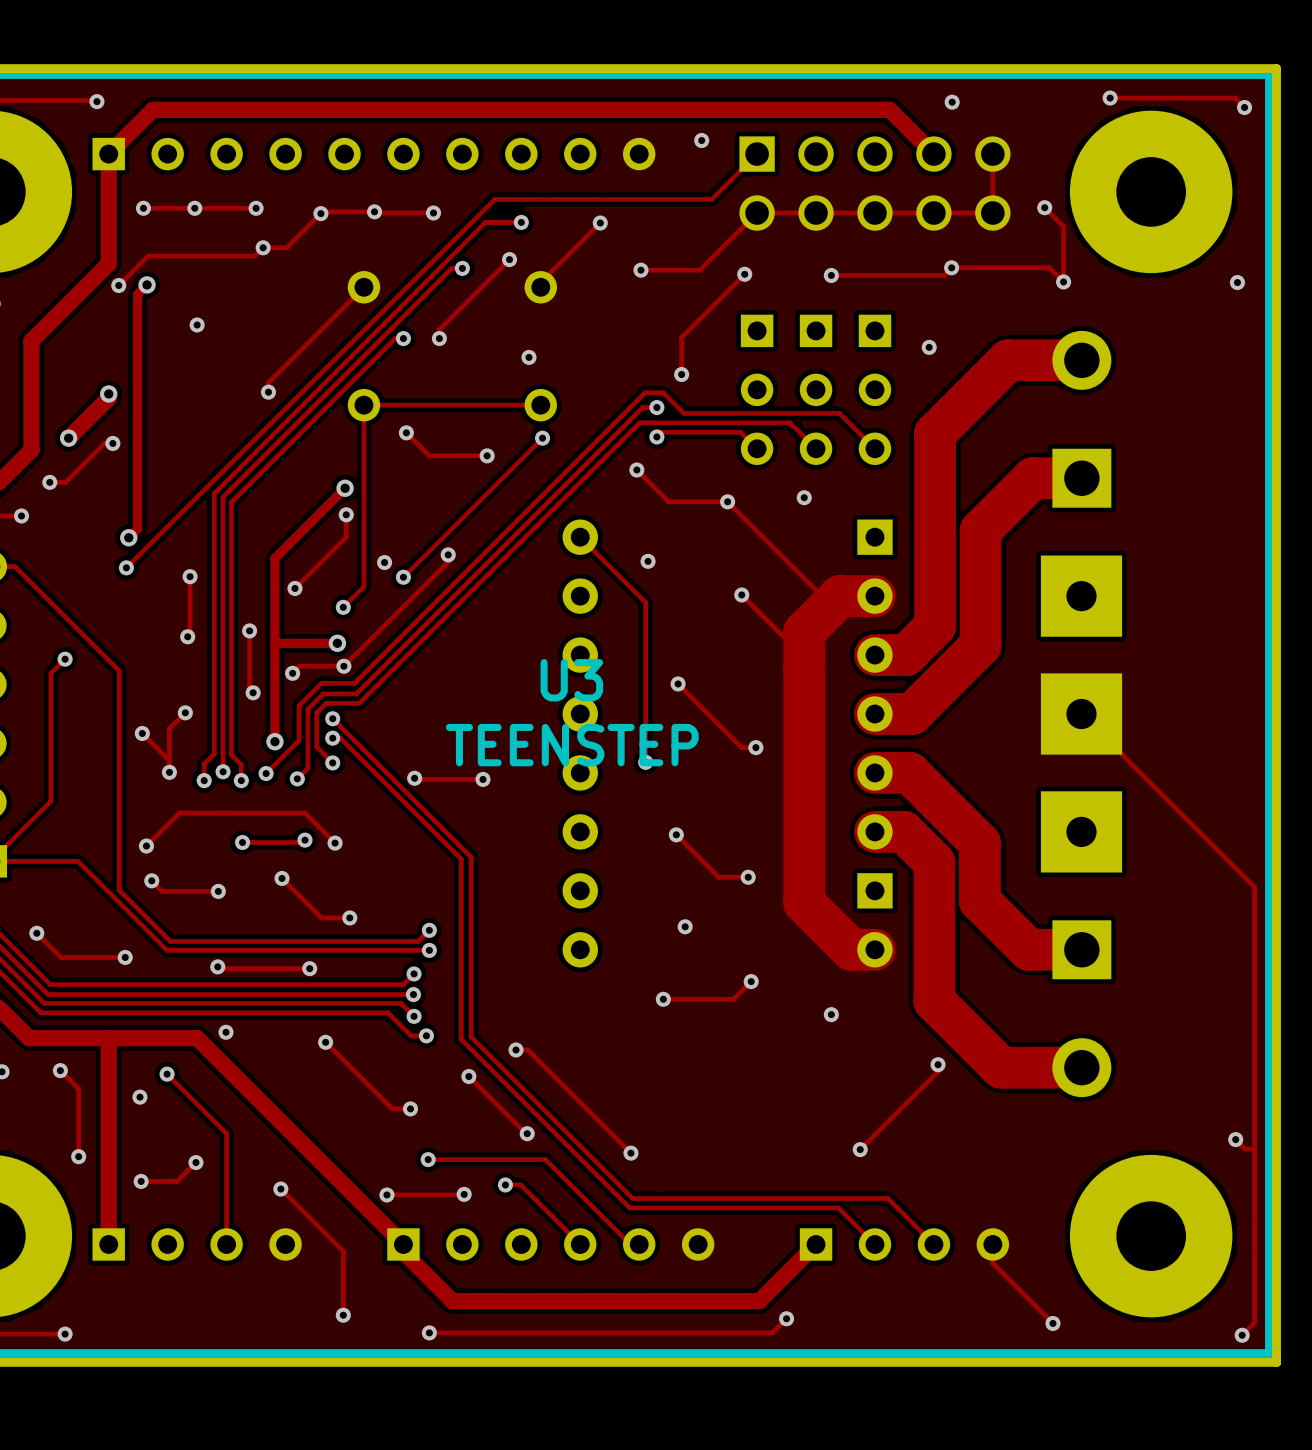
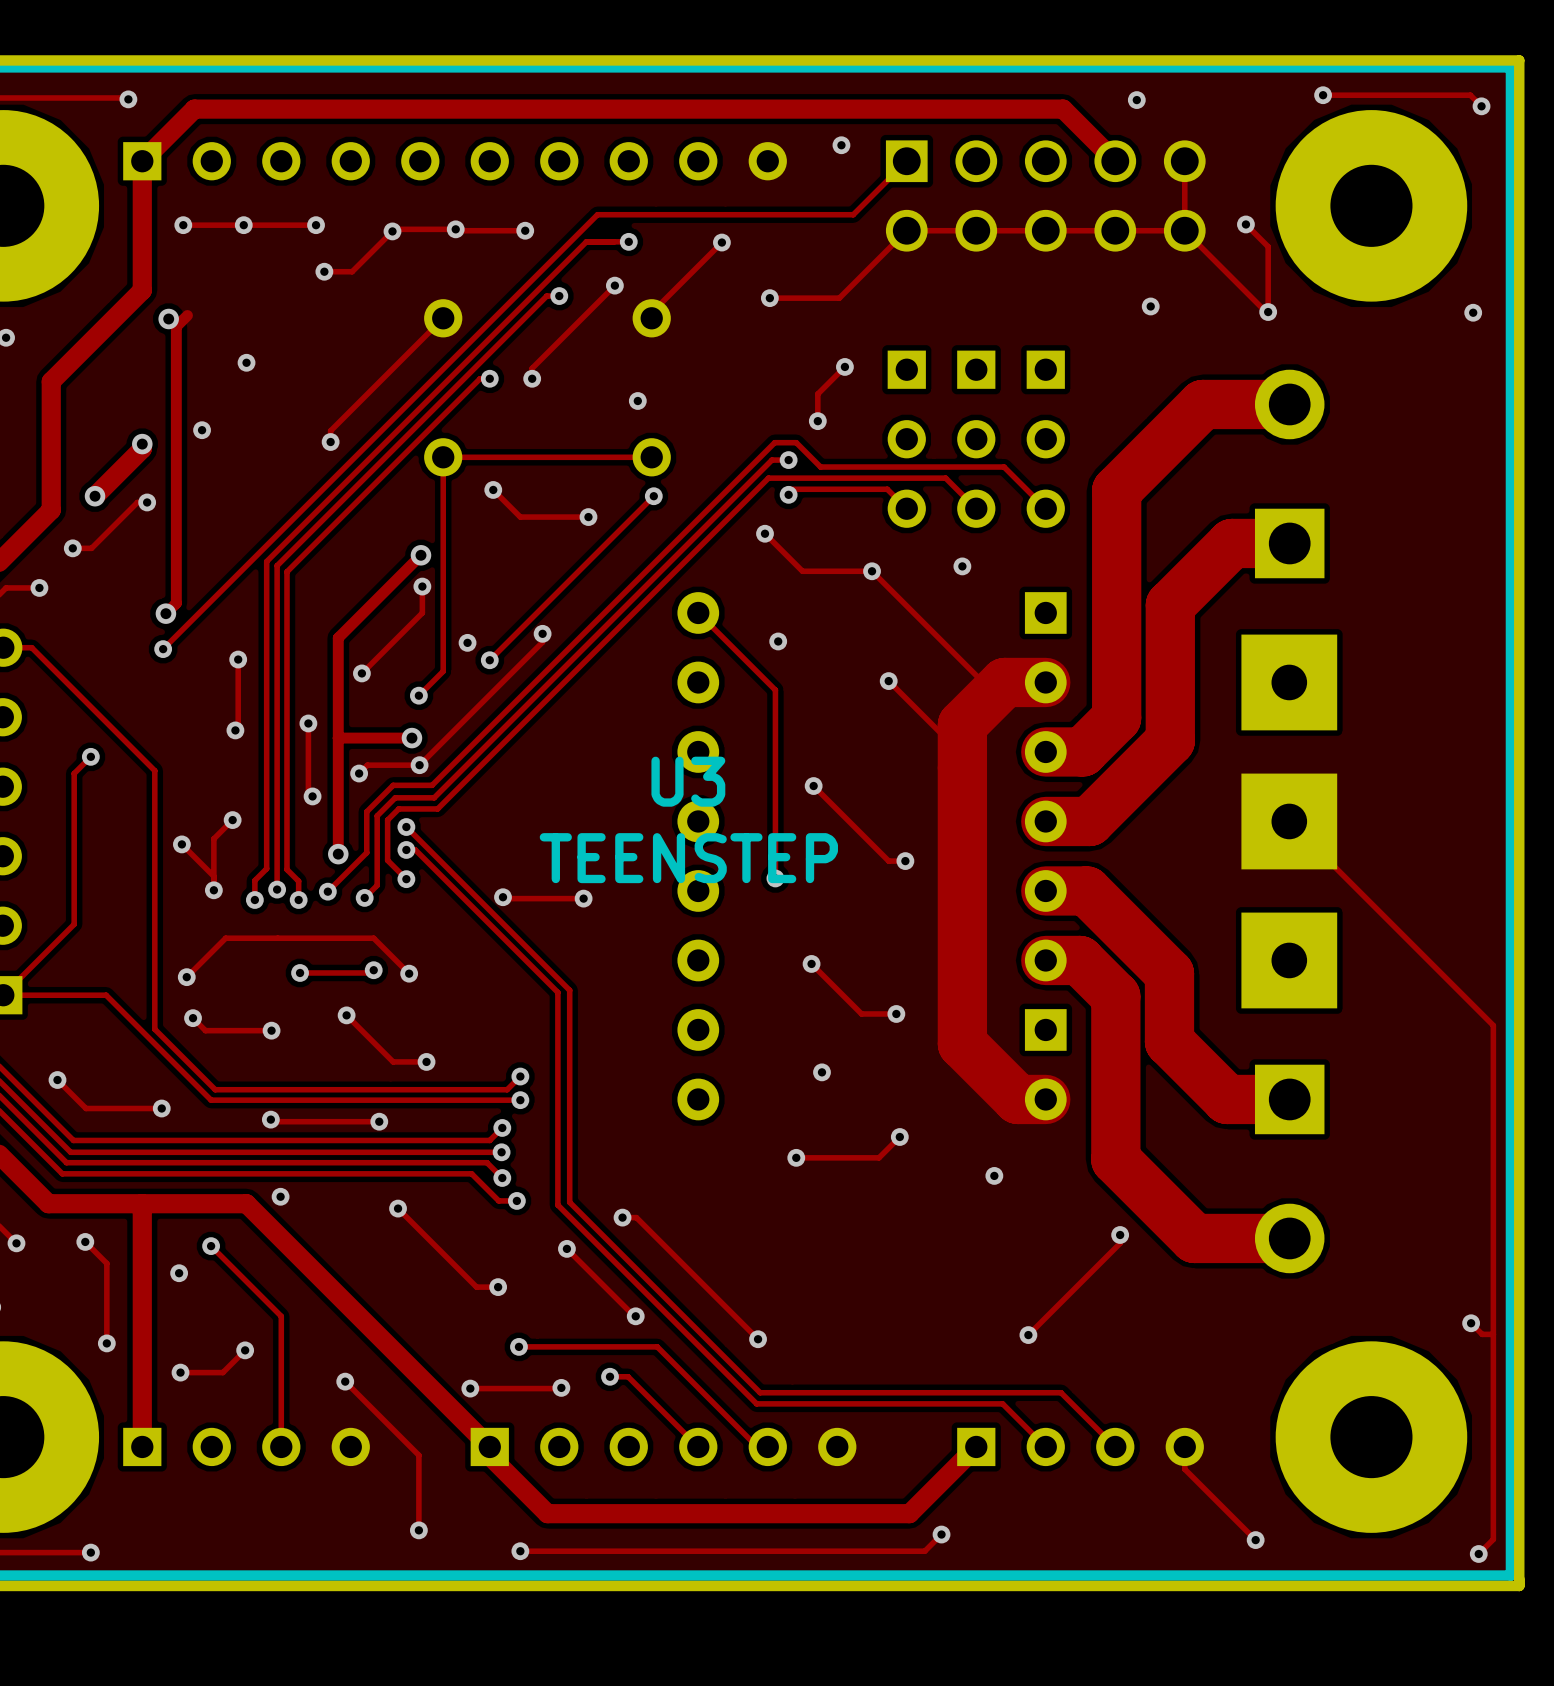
track: (263, 247) (254, 256) (148, 256) (118, 285) -> none
via position: (951, 267) -> (1150, 306)
track: (744, 274) (681, 337) (681, 351) -> (844, 366) (817, 394)
via position: (744, 274) -> (844, 366)
track: (831, 275) (943, 275) (951, 267) (1049, 267) (1063, 281) -> (1184, 230) (1268, 312)
via: (831, 275) -> none
via position: (147, 284) -> (168, 318)
via position: (118, 285) -> (202, 430)
via: (929, 347) -> none

